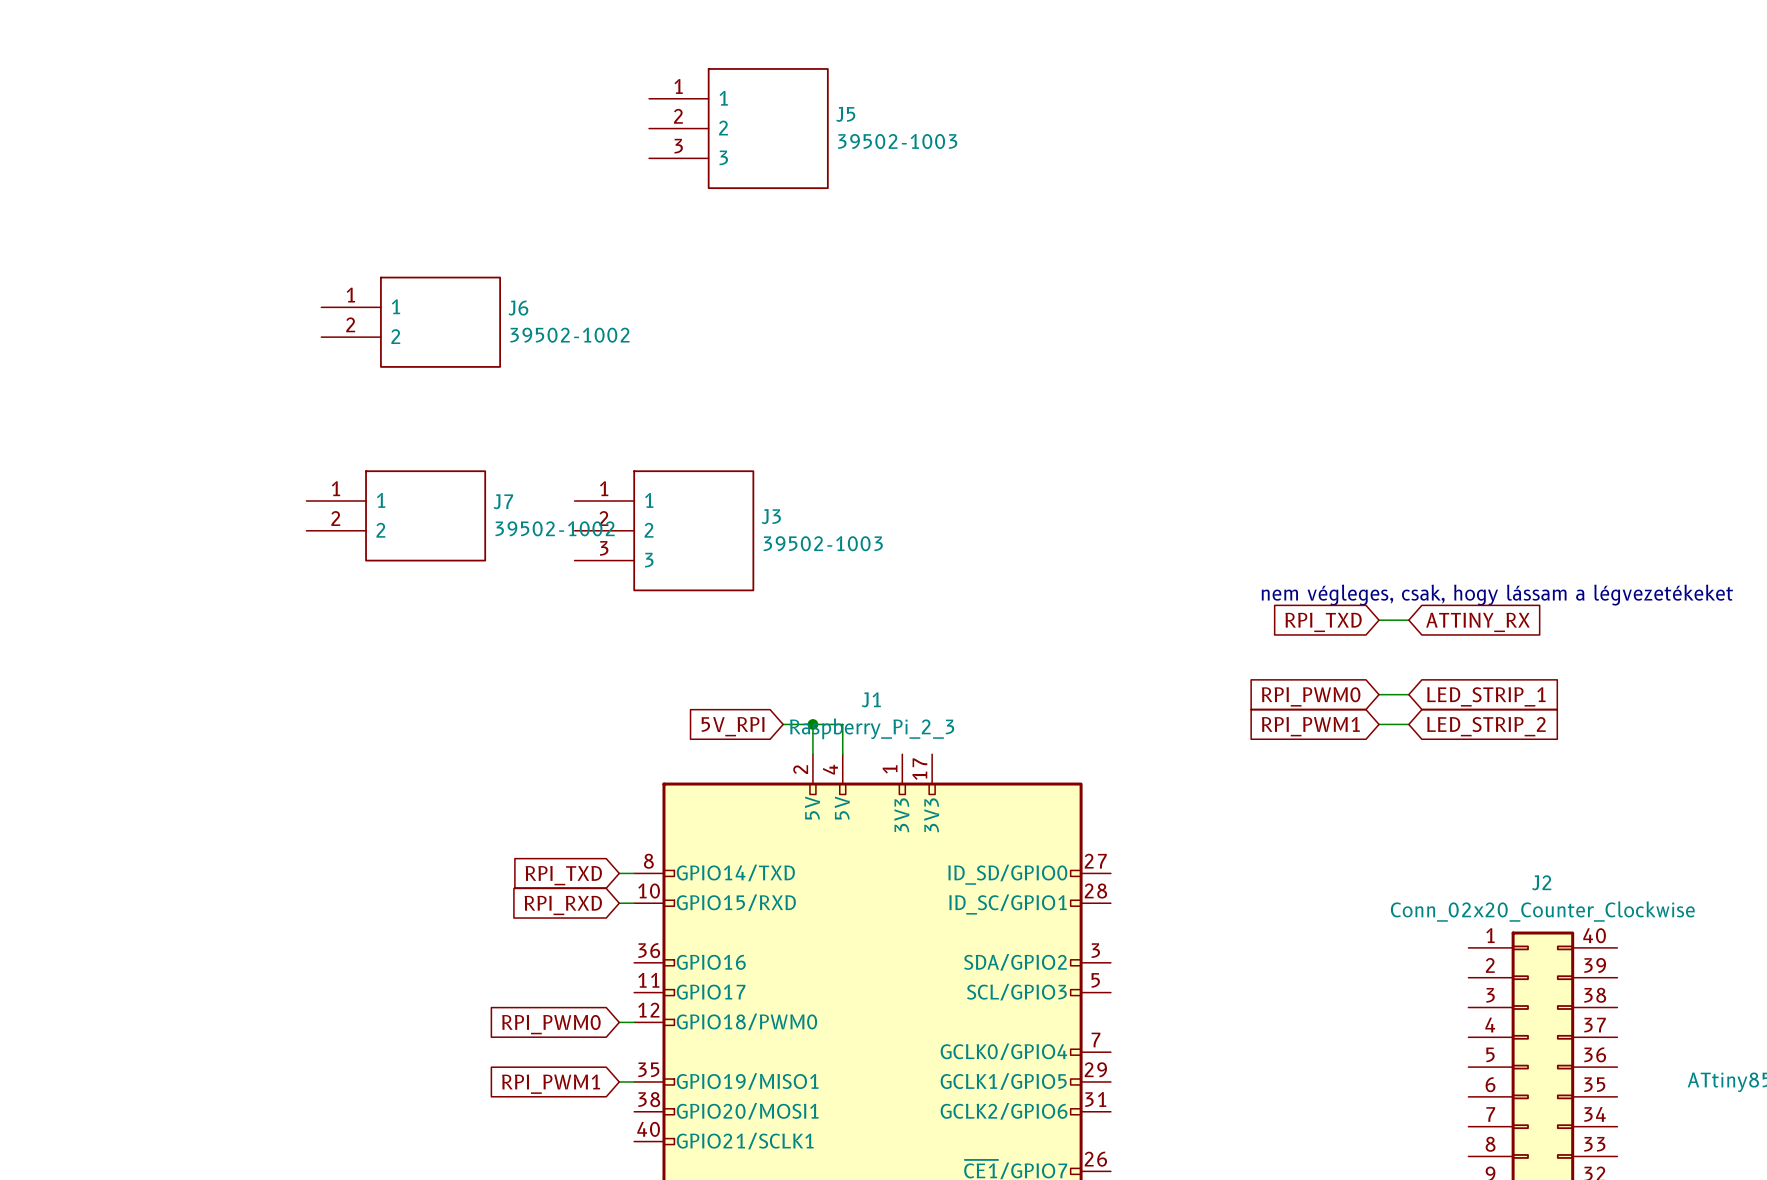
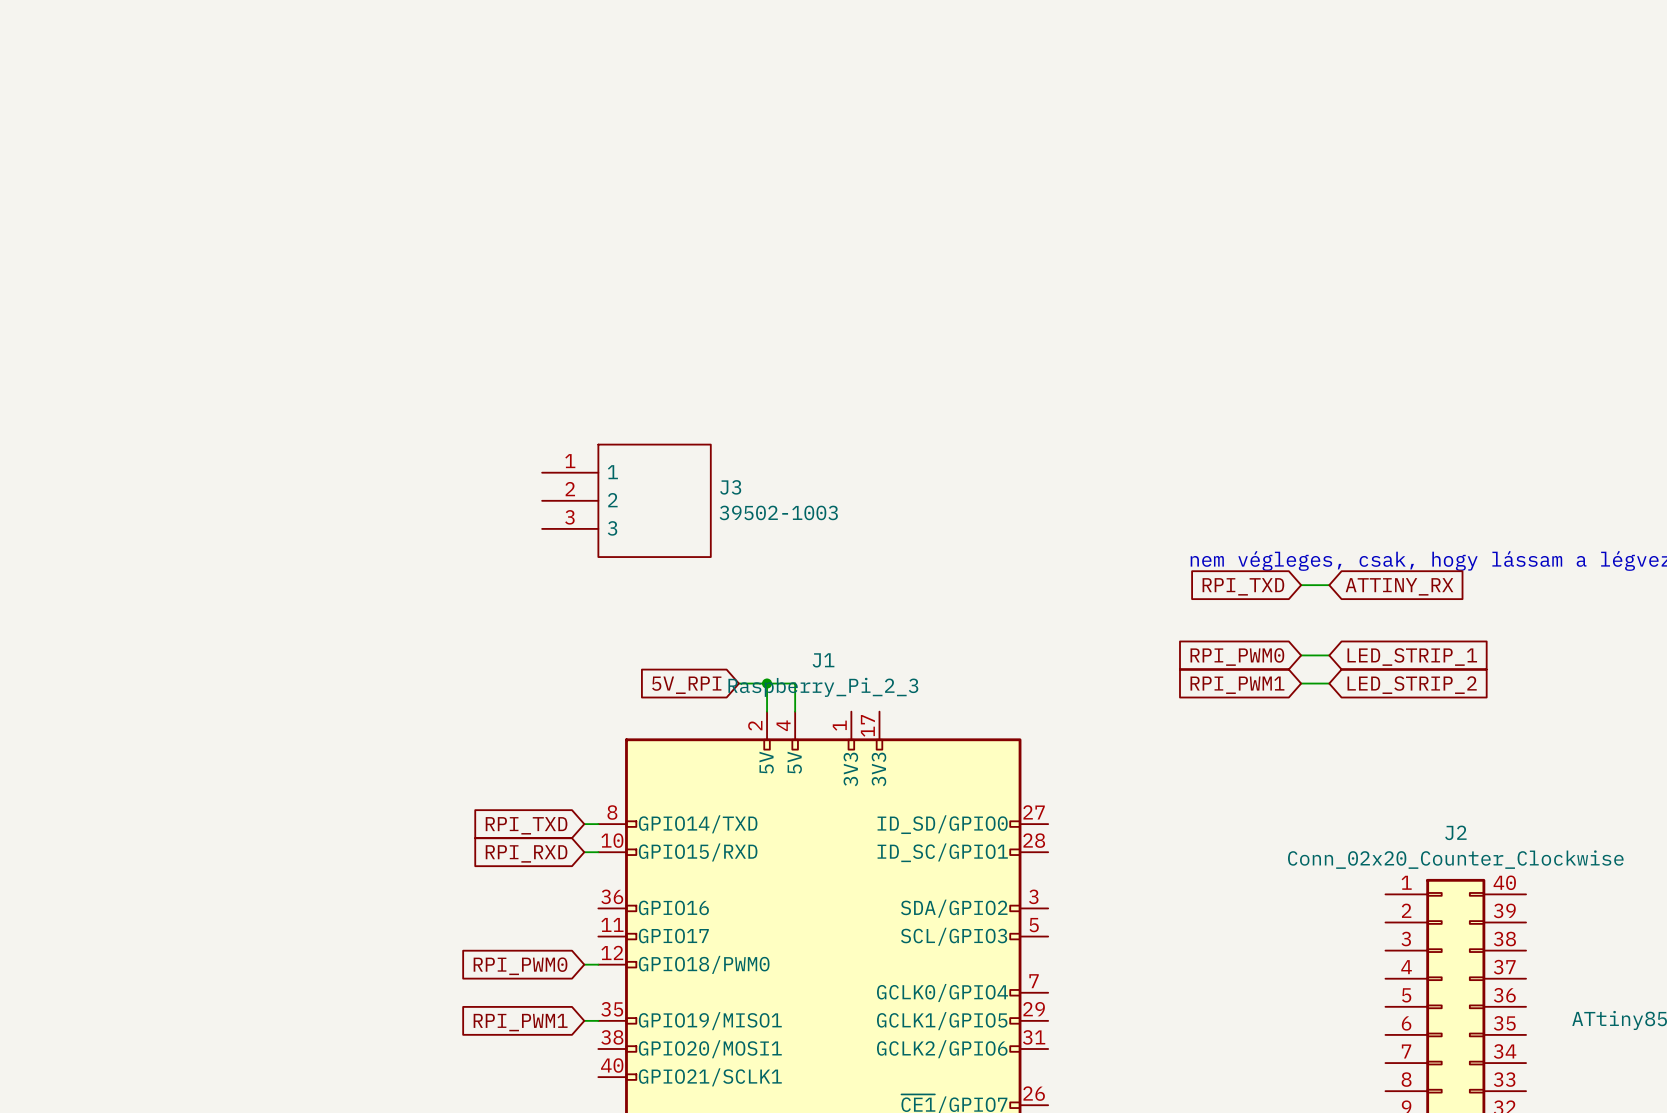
J5: 39502-1003 (738, 128) -> none
J6: 39502-1002 (411, 322) -> none
J7: 39502-1002 (396, 515) -> none

